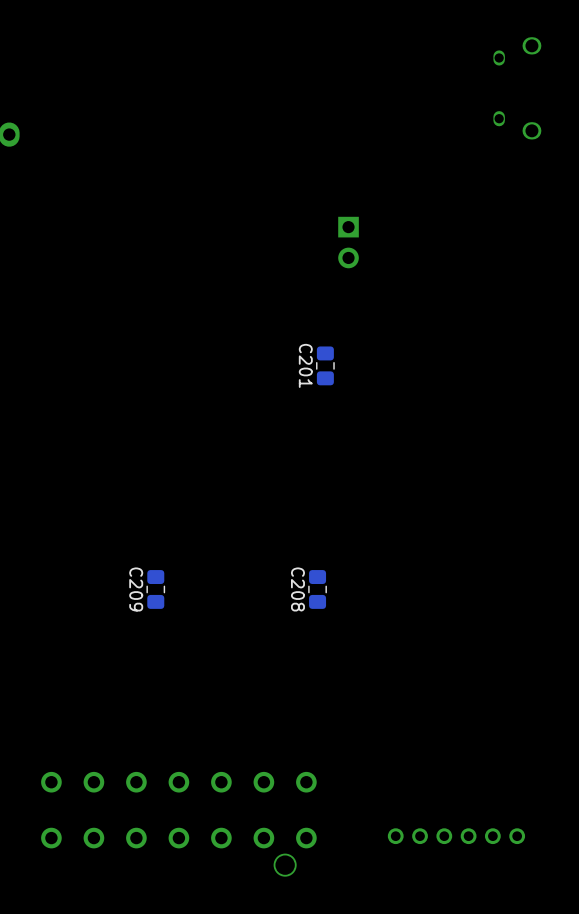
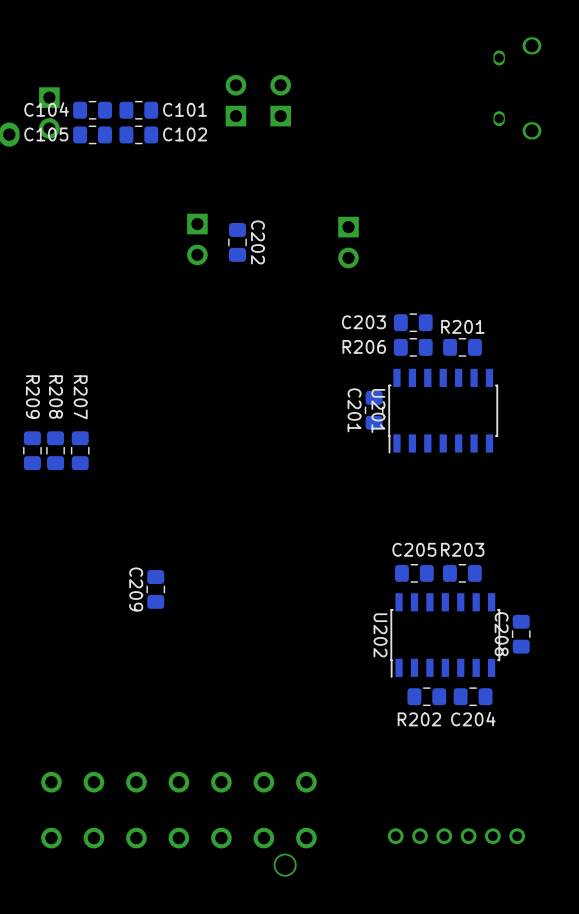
part: none -> (235, 100)
part: none -> (280, 100)
C104: none -> (92, 110)
C101: none -> (138, 110)
part: none -> (49, 113)
C105: none -> (92, 134)
C102: none -> (138, 134)
part: none -> (197, 239)
C202: none -> (237, 242)
C203: none -> (413, 322)
R206: none -> (413, 347)
R201: none -> (462, 347)
C201 position: (325, 365) -> (374, 410)
U201: none -> (443, 411)
R209: none -> (32, 450)
R208: none -> (55, 450)
R207: none -> (80, 450)
C205: none -> (414, 573)
R203: none -> (462, 573)
C208 position: (317, 589) -> (521, 634)
U202: none -> (445, 635)
R202: none -> (426, 696)
C204: none -> (473, 696)

